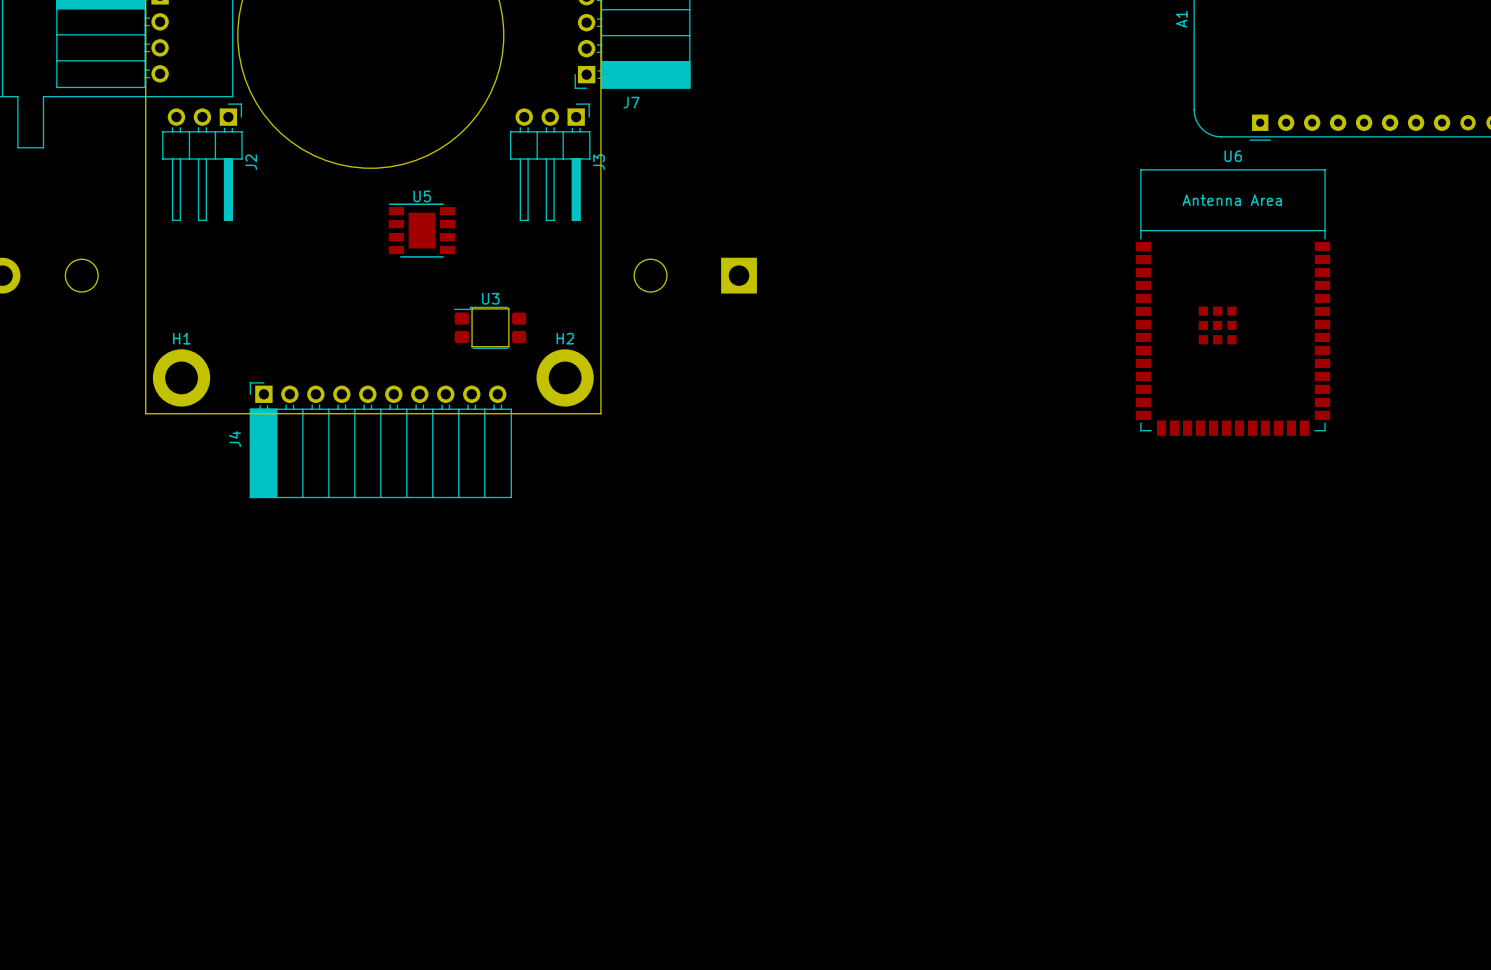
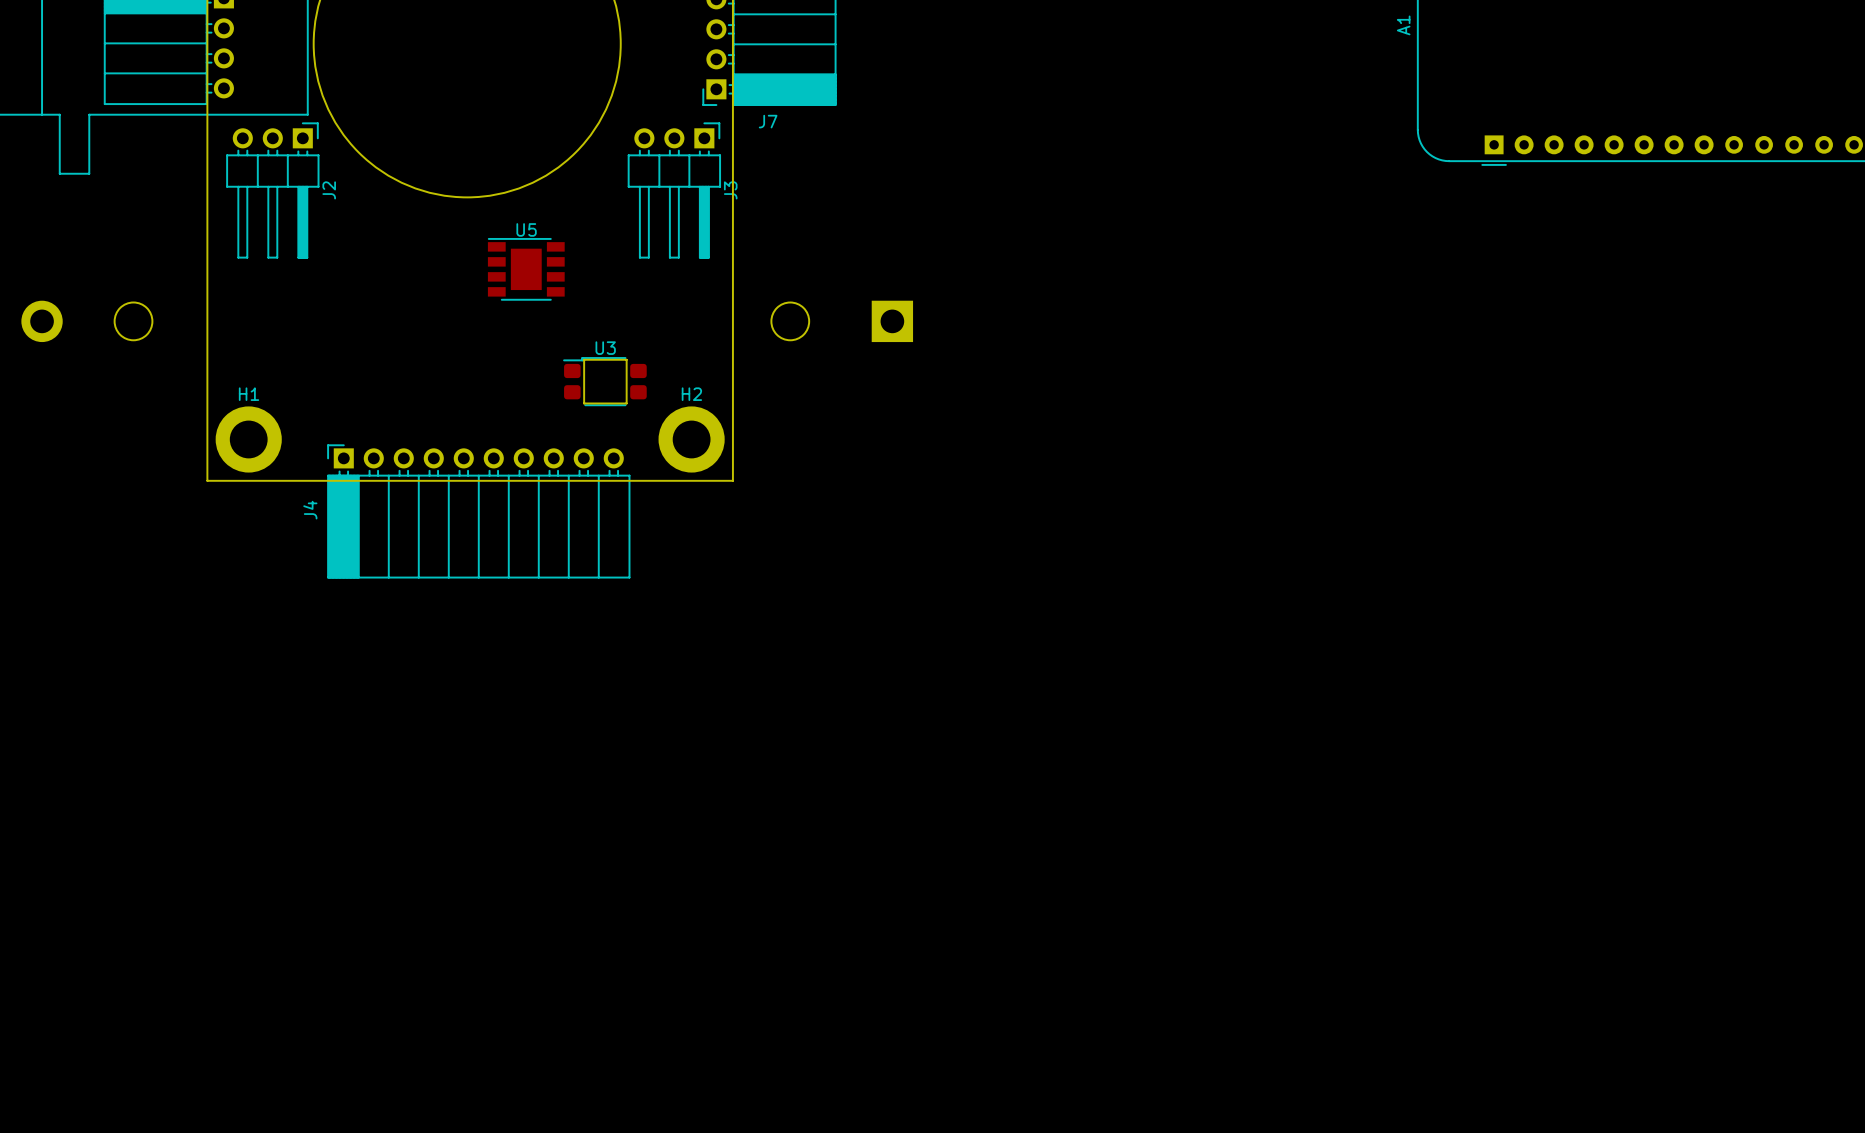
U6: (1232, 302) -> none

